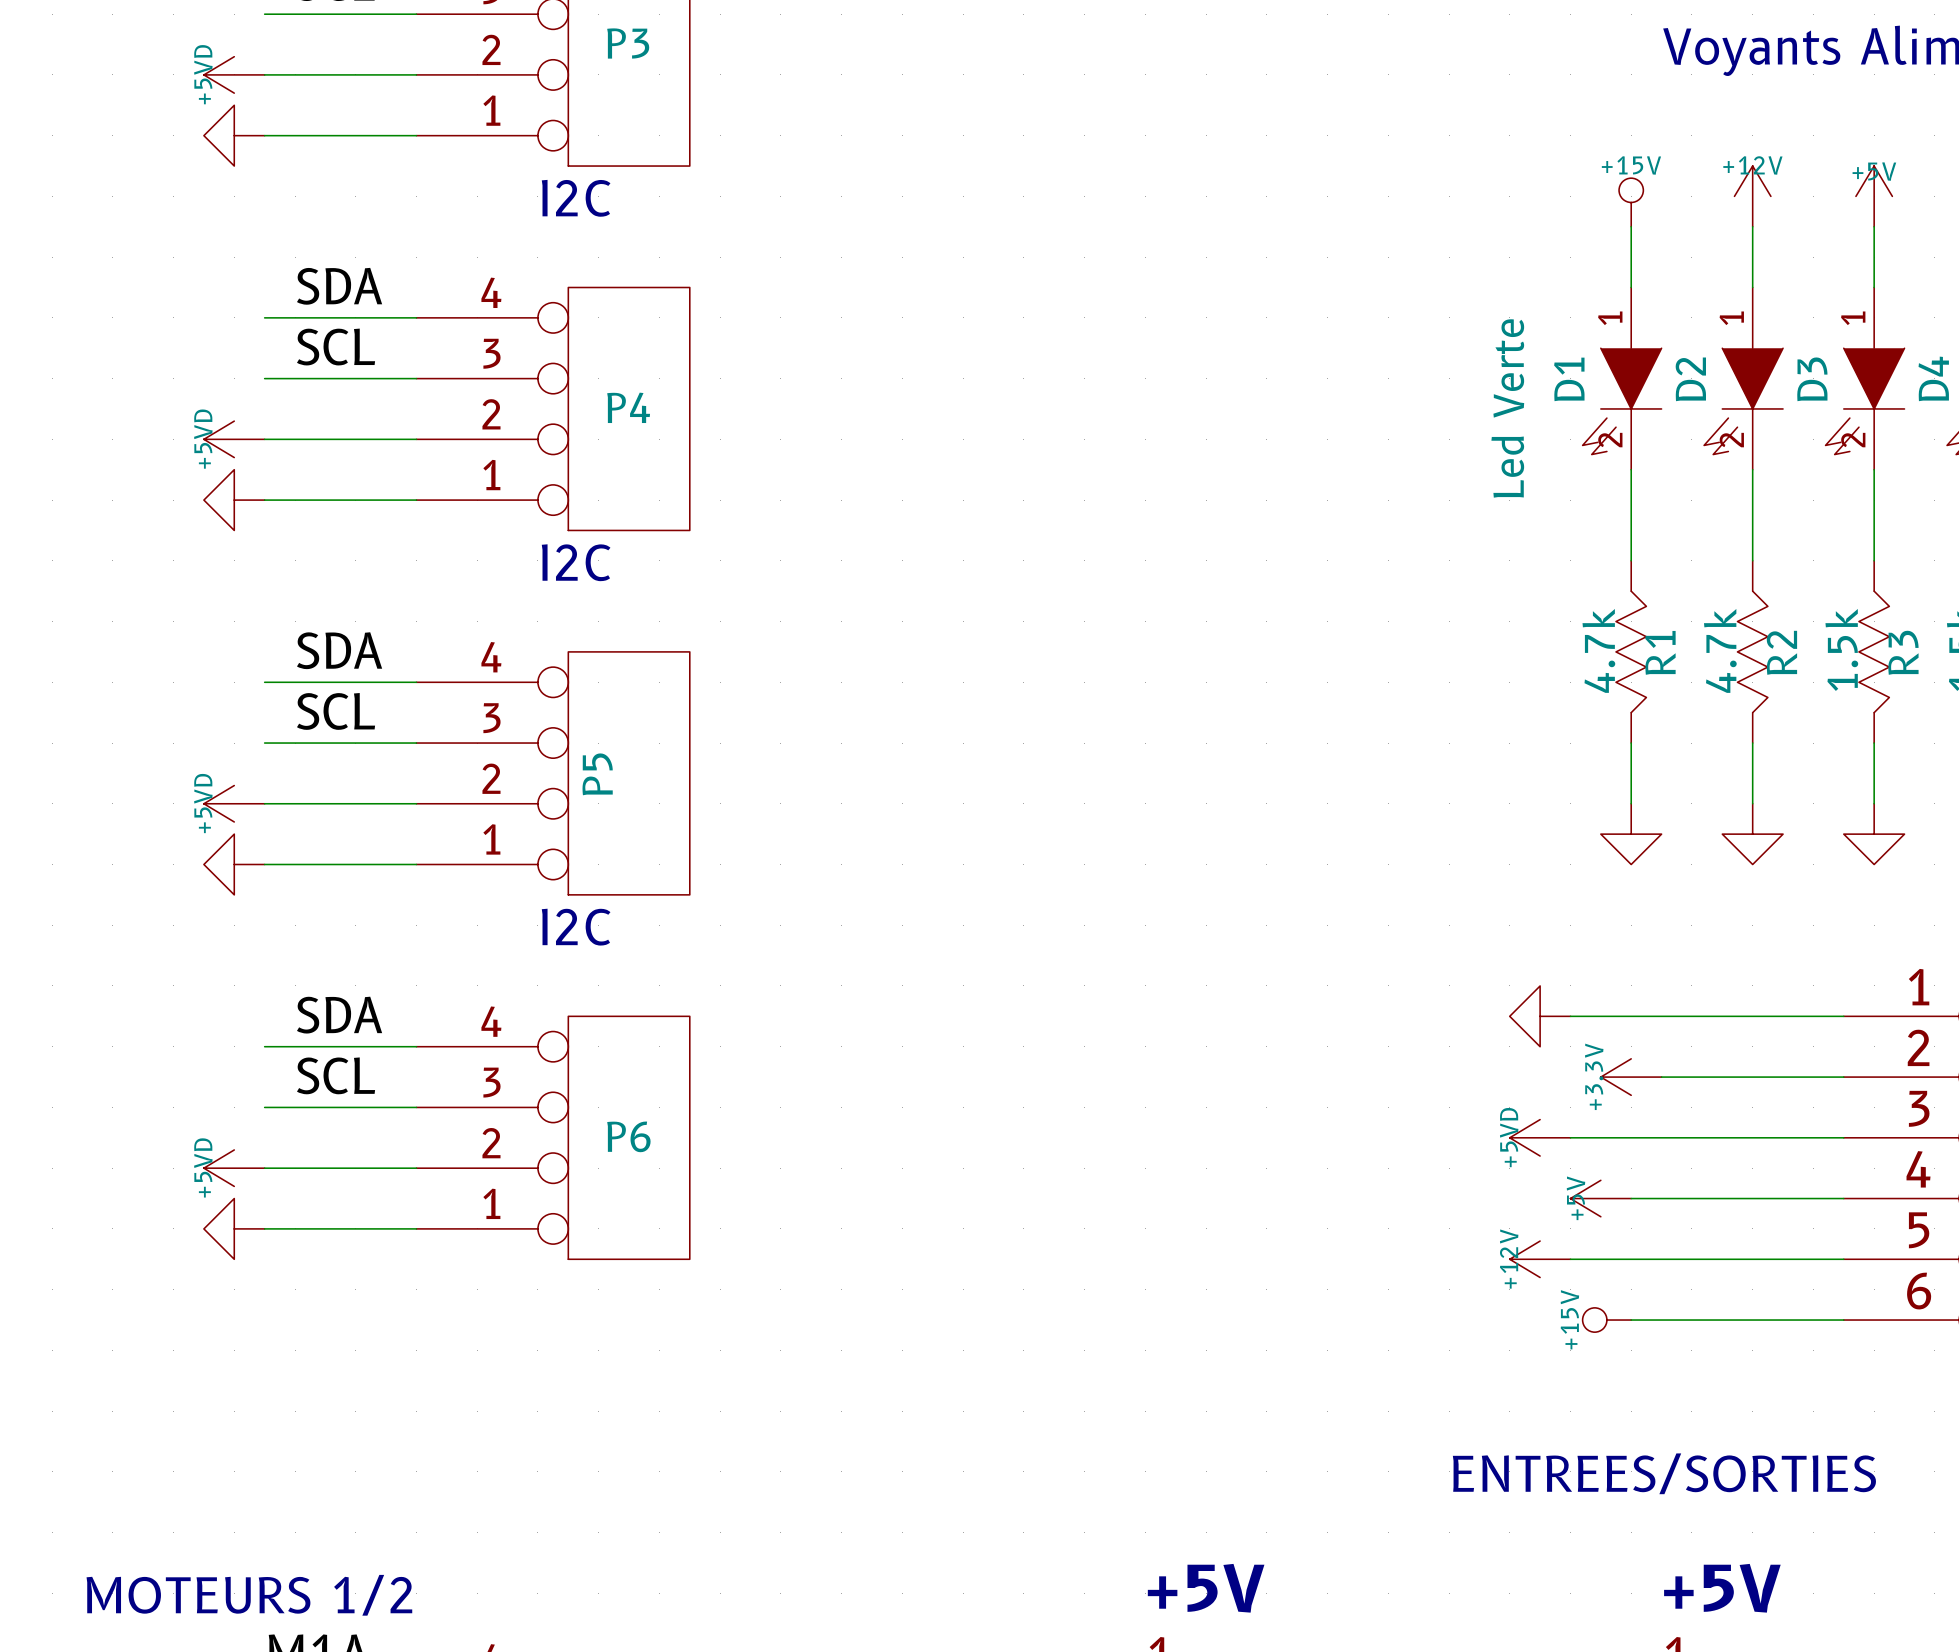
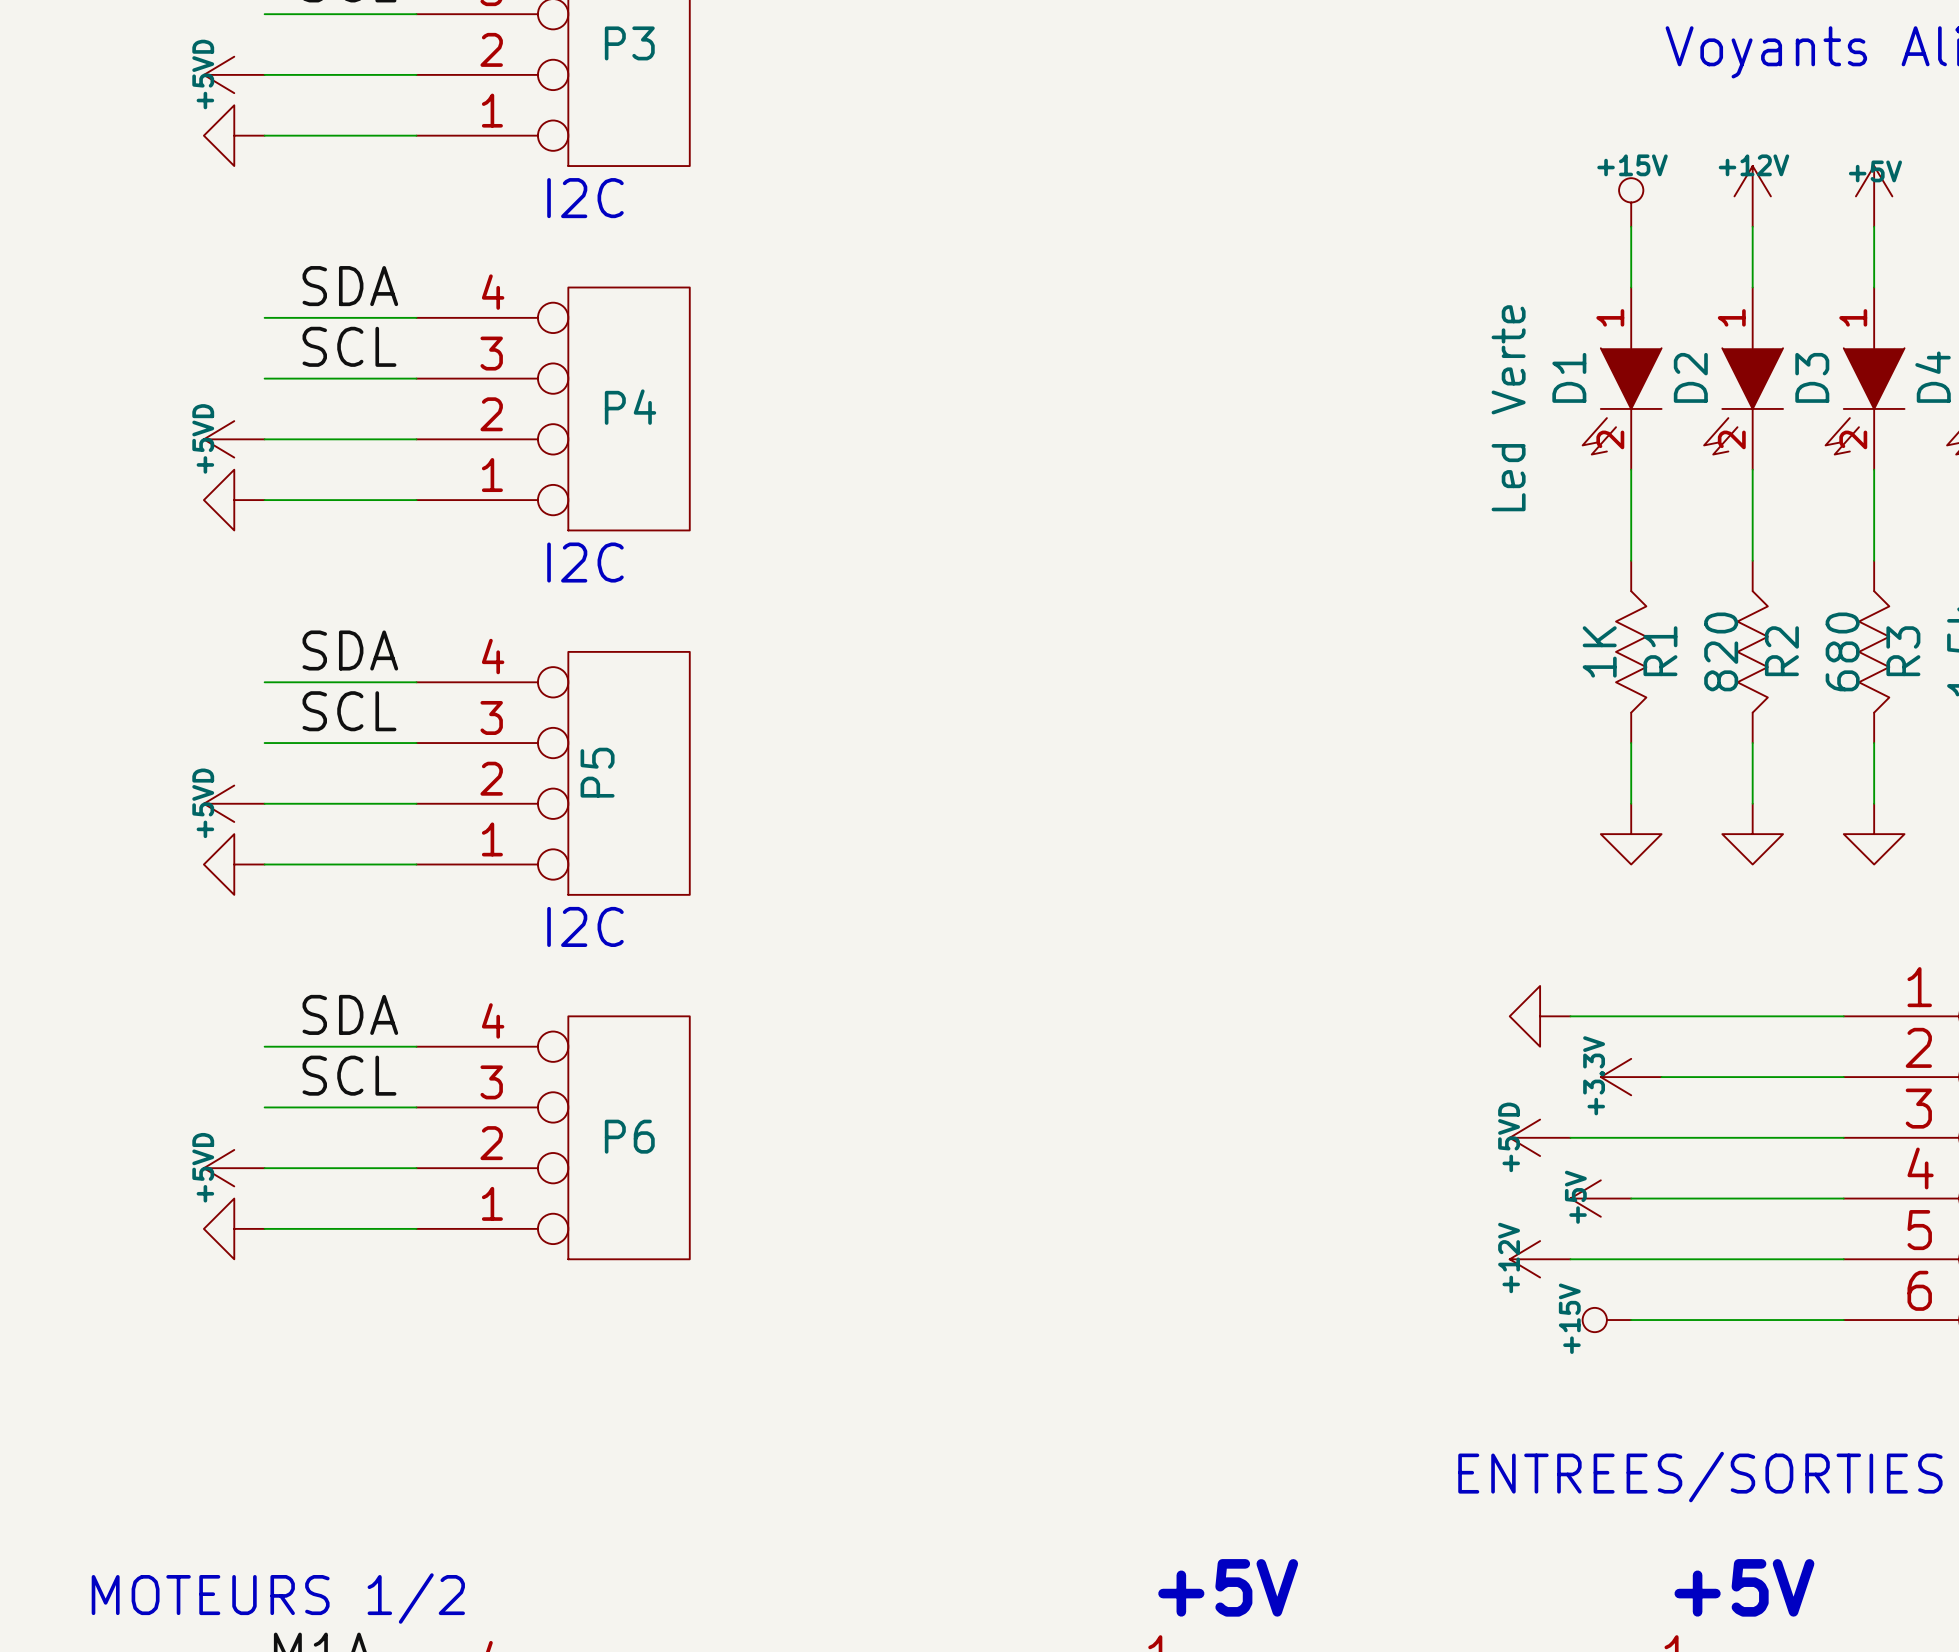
R3 value: 1.5k (1841, 649) -> 680 (1842, 651)
R1 value: 4.7k (1598, 650) -> 1K (1599, 651)
R2 value: 4.7k (1720, 650) -> 820 (1721, 651)

